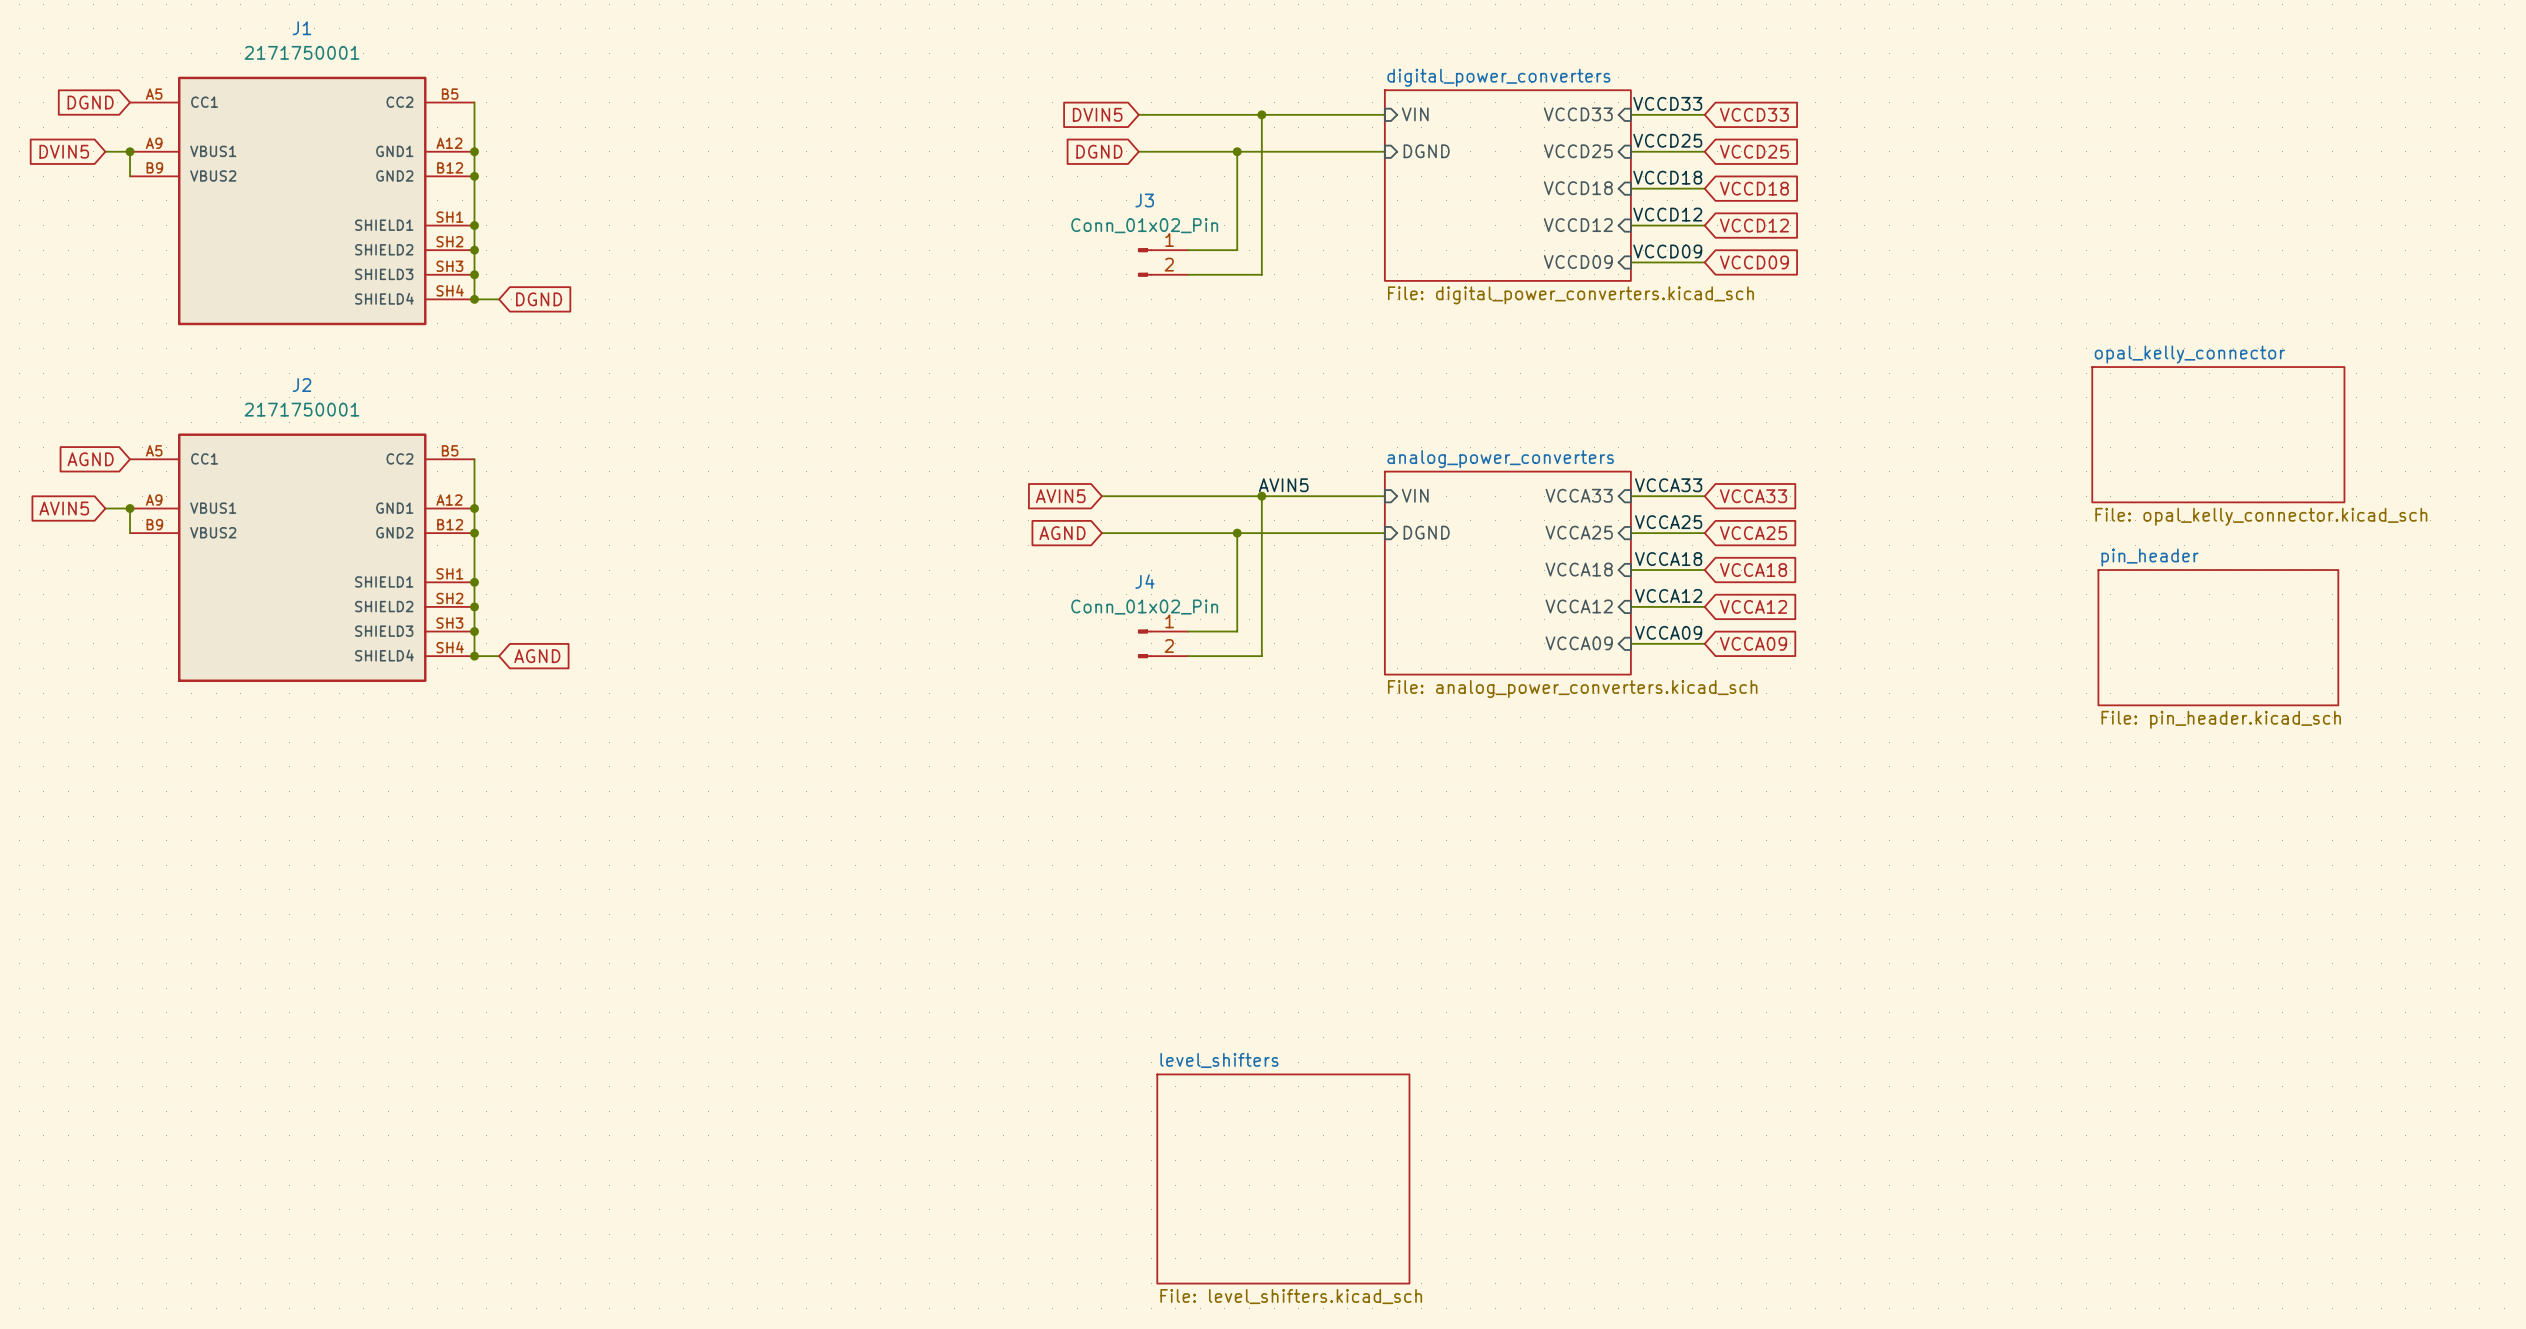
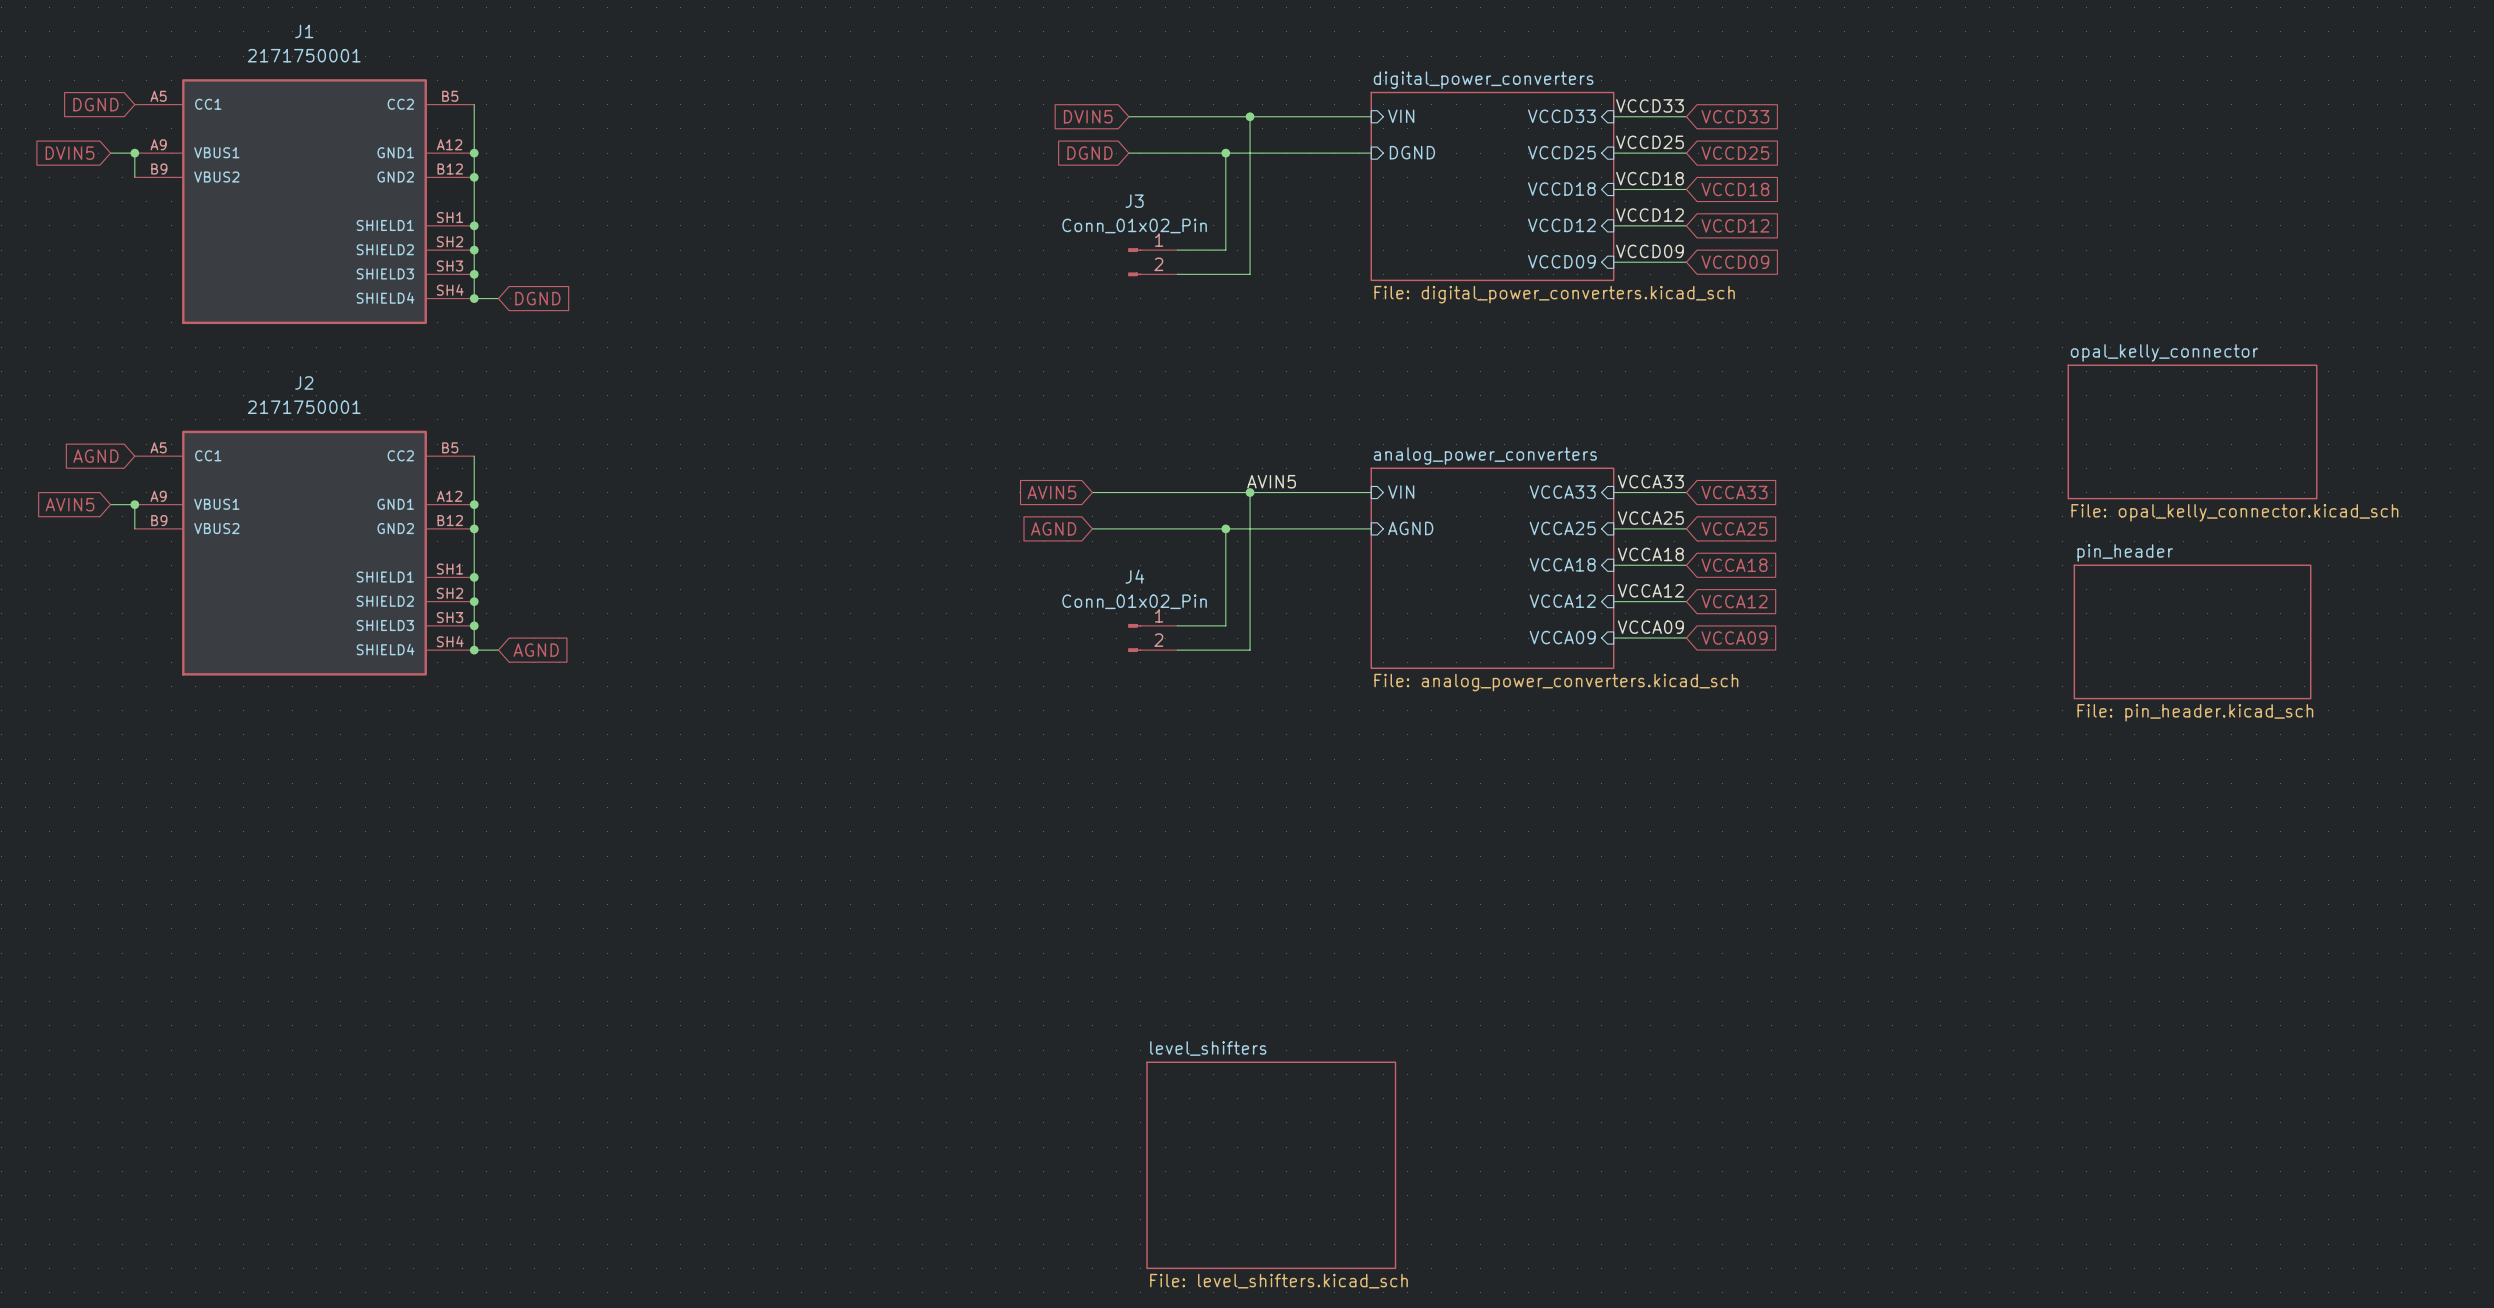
sheet pin: DGND (1426, 532) -> AGND (1410, 528)

